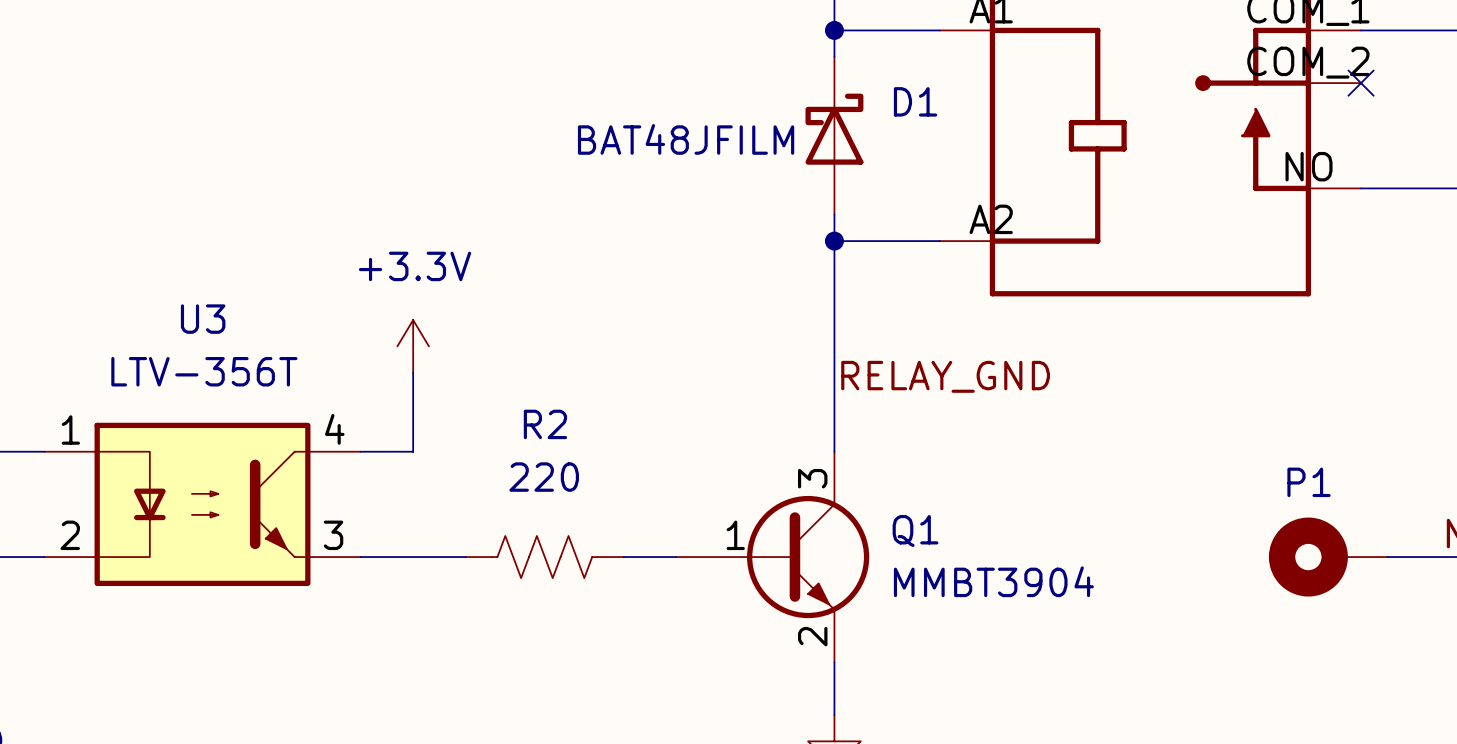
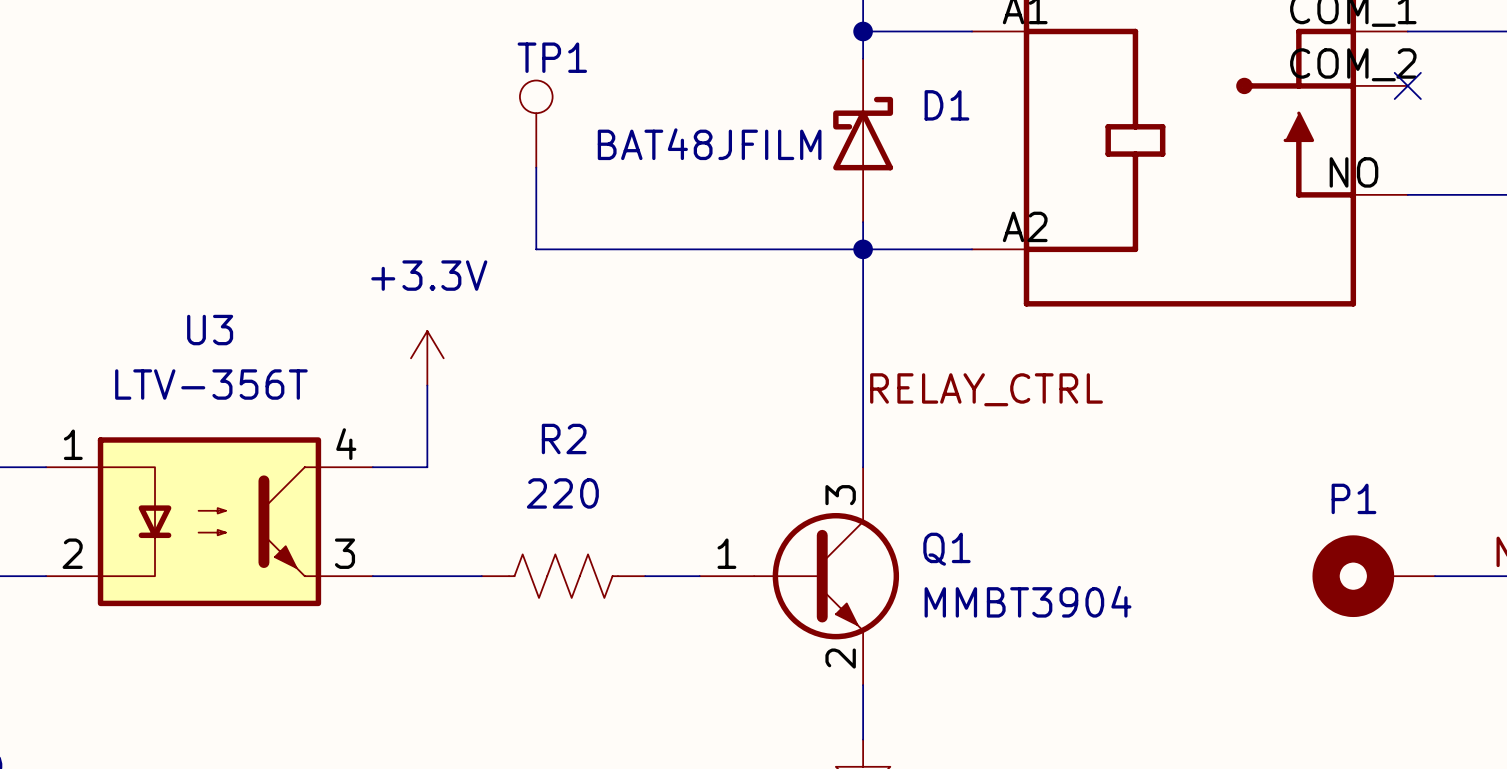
TP1: none -> (536, 124)
wire: none -> (536, 167) (536, 249) (863, 249)
label: RELAY_GND (945, 376) -> RELAY_CTRL (986, 389)
Q1 symbol: [676, 451, 870, 663] -> [699, 467, 900, 686]

